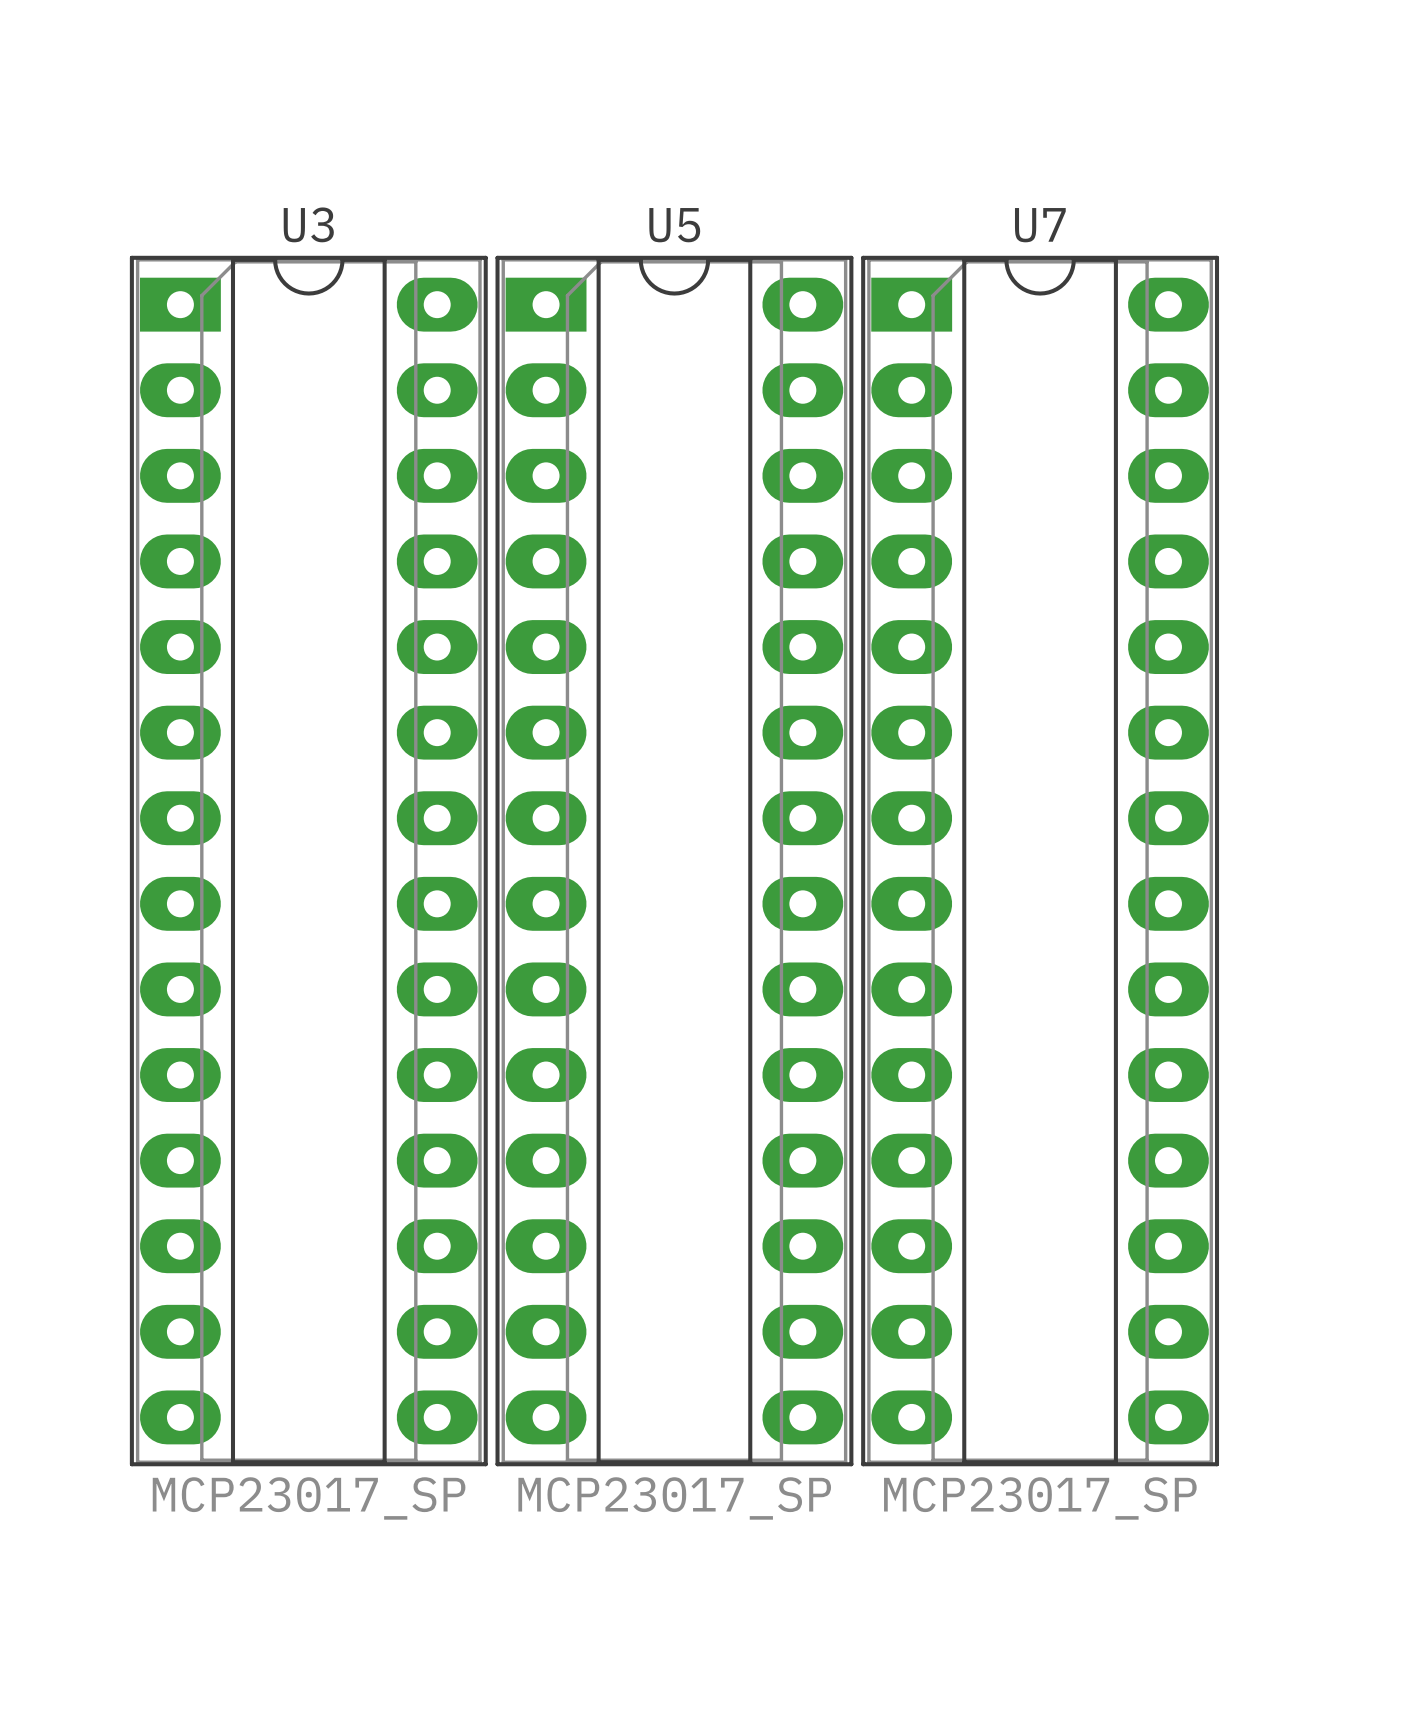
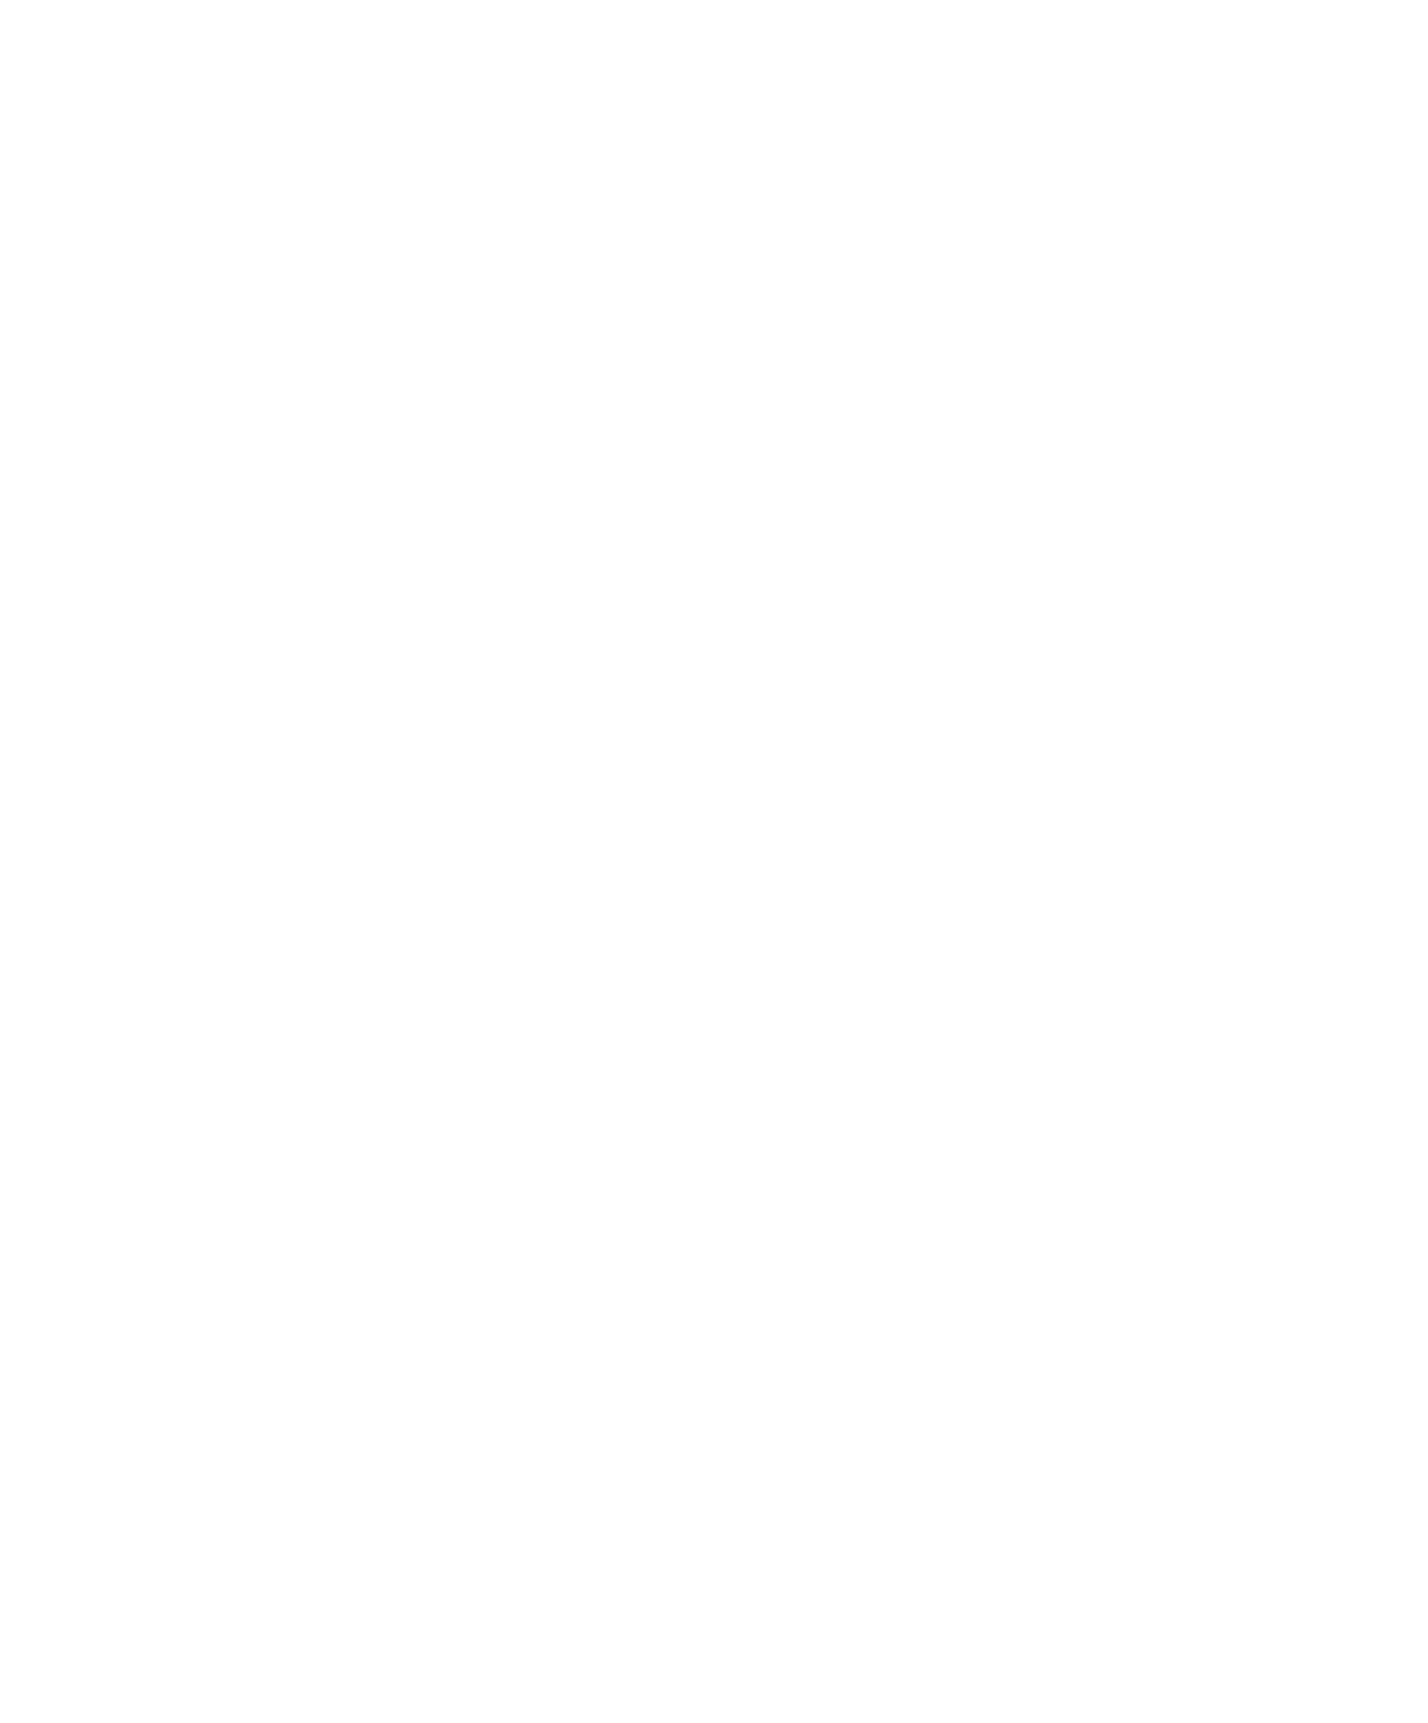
U3: MCP23017_SP (308, 861) -> none
U5: MCP23017_SP (674, 861) -> none
U7: MCP23017_SP (1040, 861) -> none

